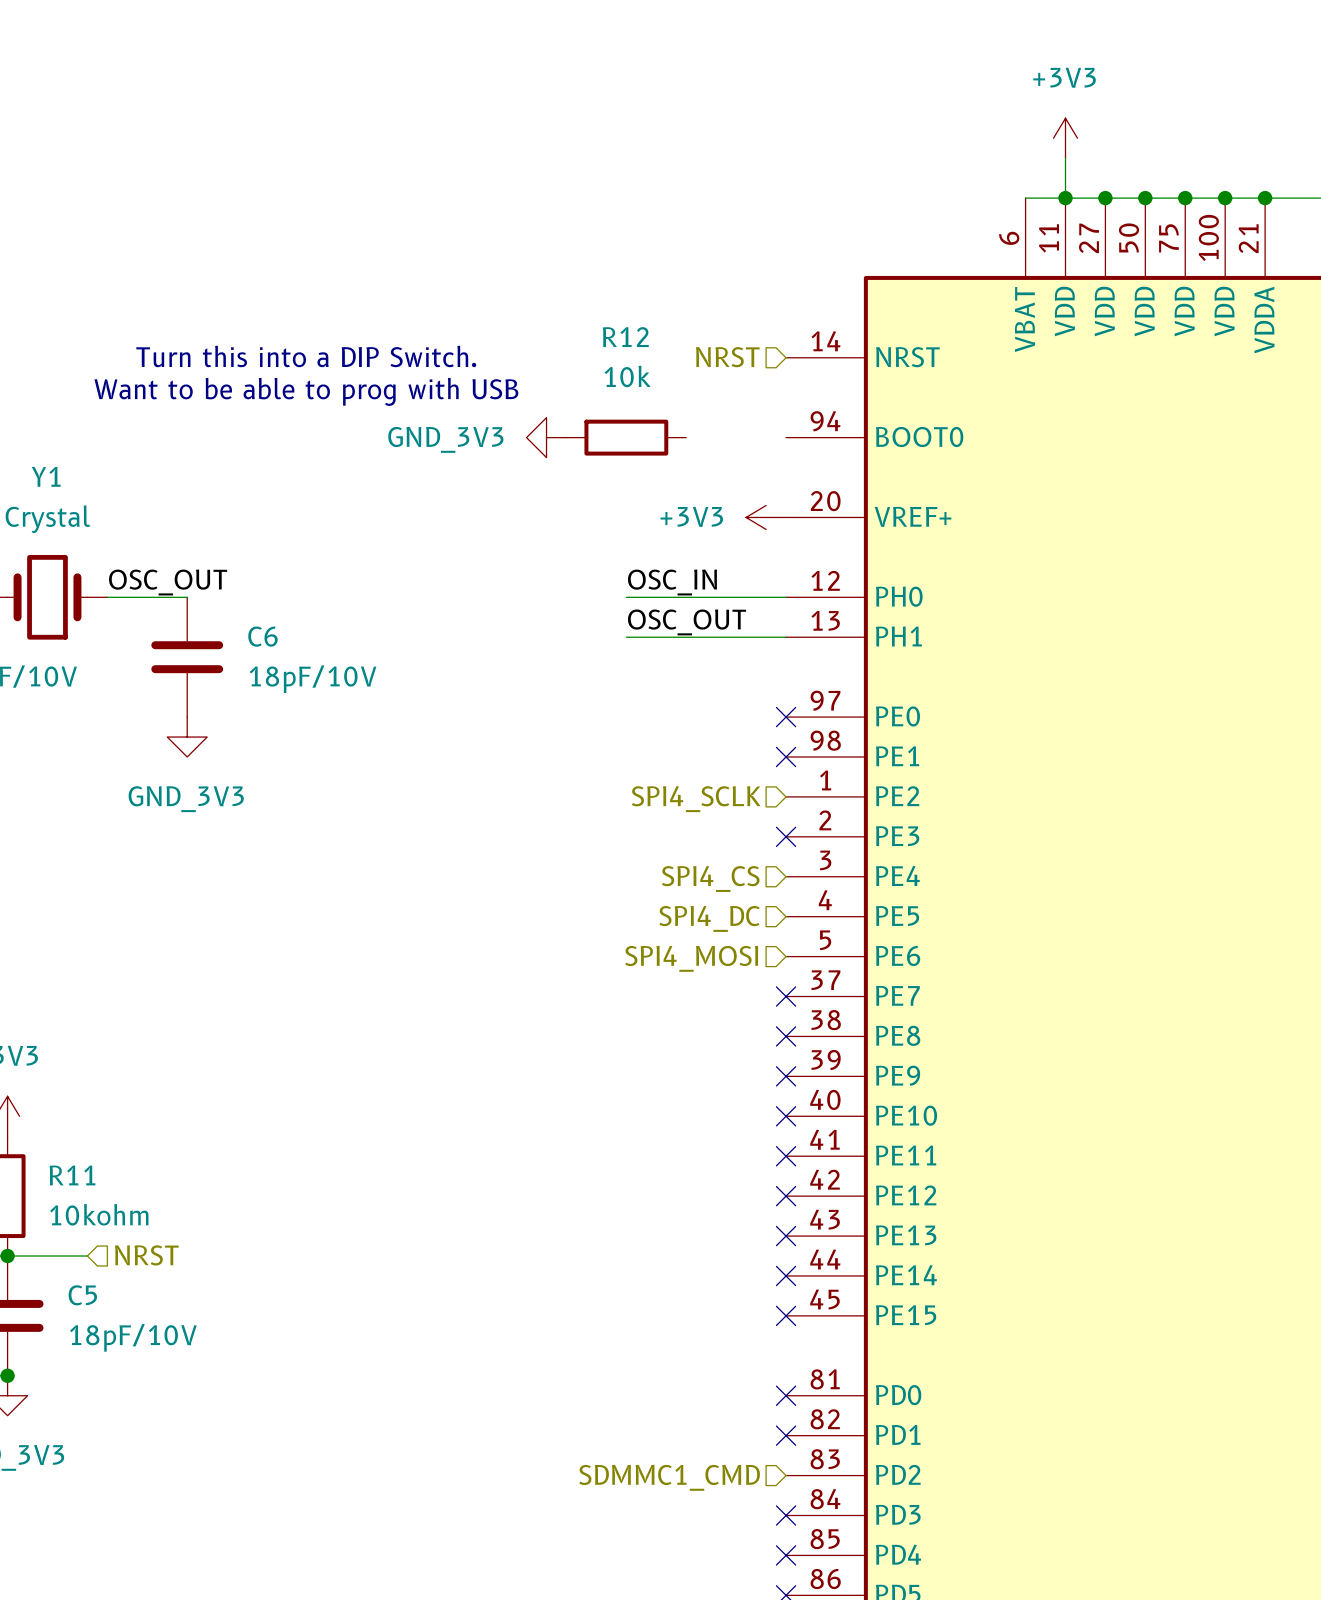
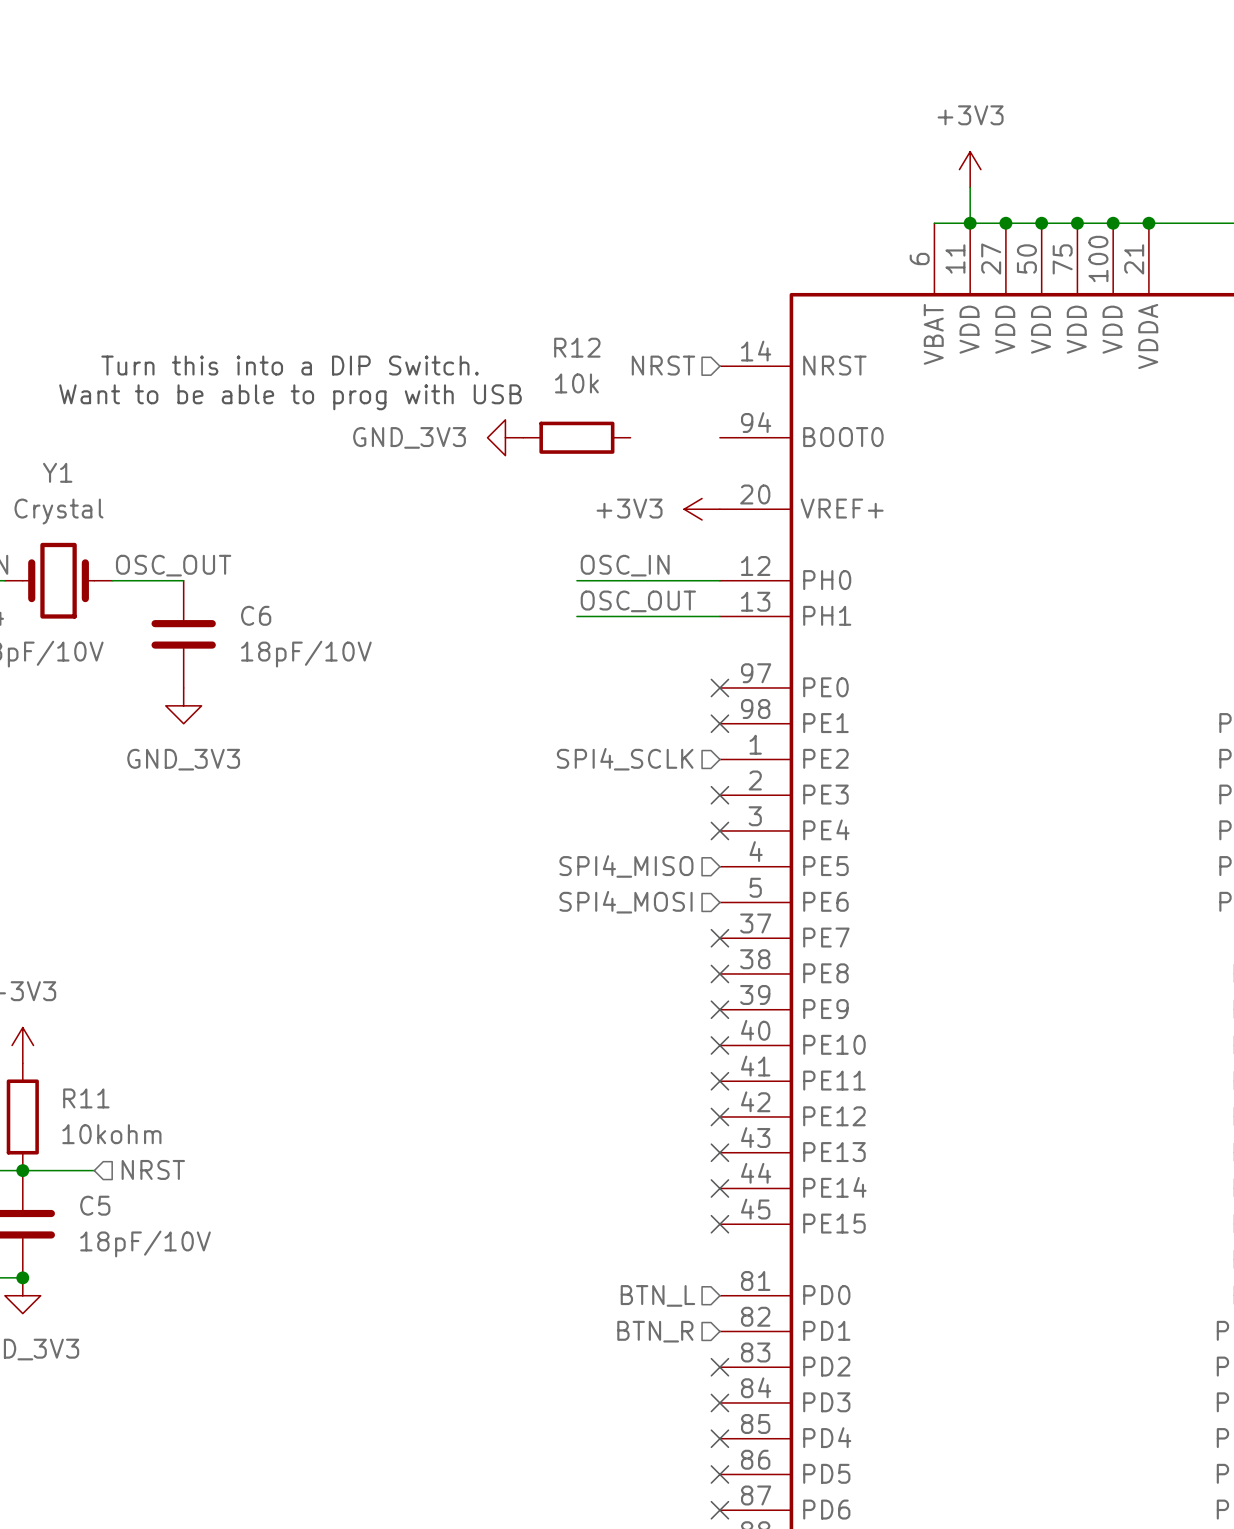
no-connect mark: none -> (719, 830)
hierarchical label: SPI4_CS (710, 879) -> none
hierarchical label: SPI4_DC (709, 918) -> SPI4_MISO (626, 866)
no-connect mark: (786, 1395) -> none
hierarchical label: none -> BTN_L (657, 1295)
no-connect mark: (786, 1435) -> none
hierarchical label: none -> BTN_R (655, 1331)
no-connect mark: none -> (719, 1367)
hierarchical label: SDMMC1_CMD (669, 1477) -> none

